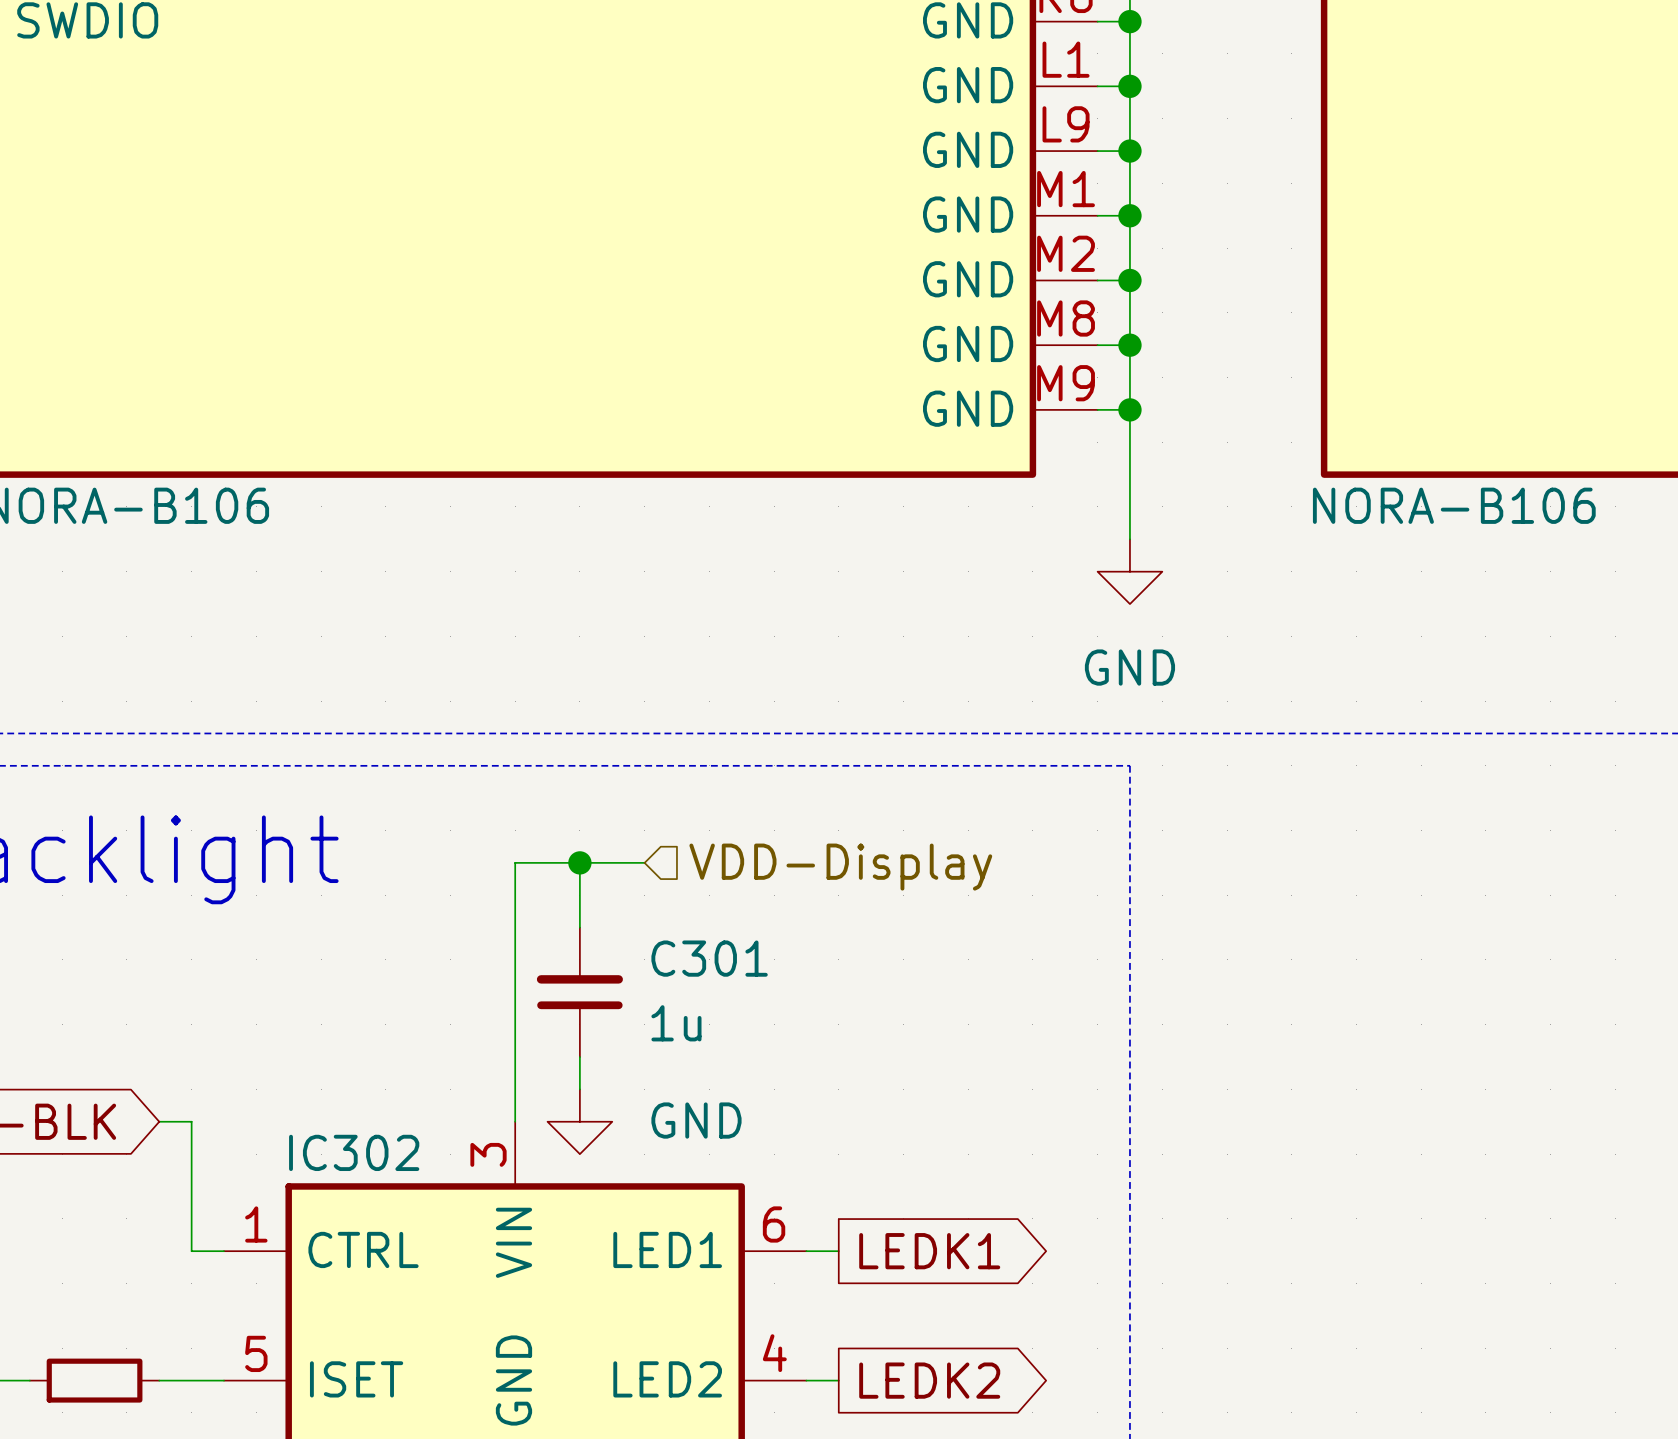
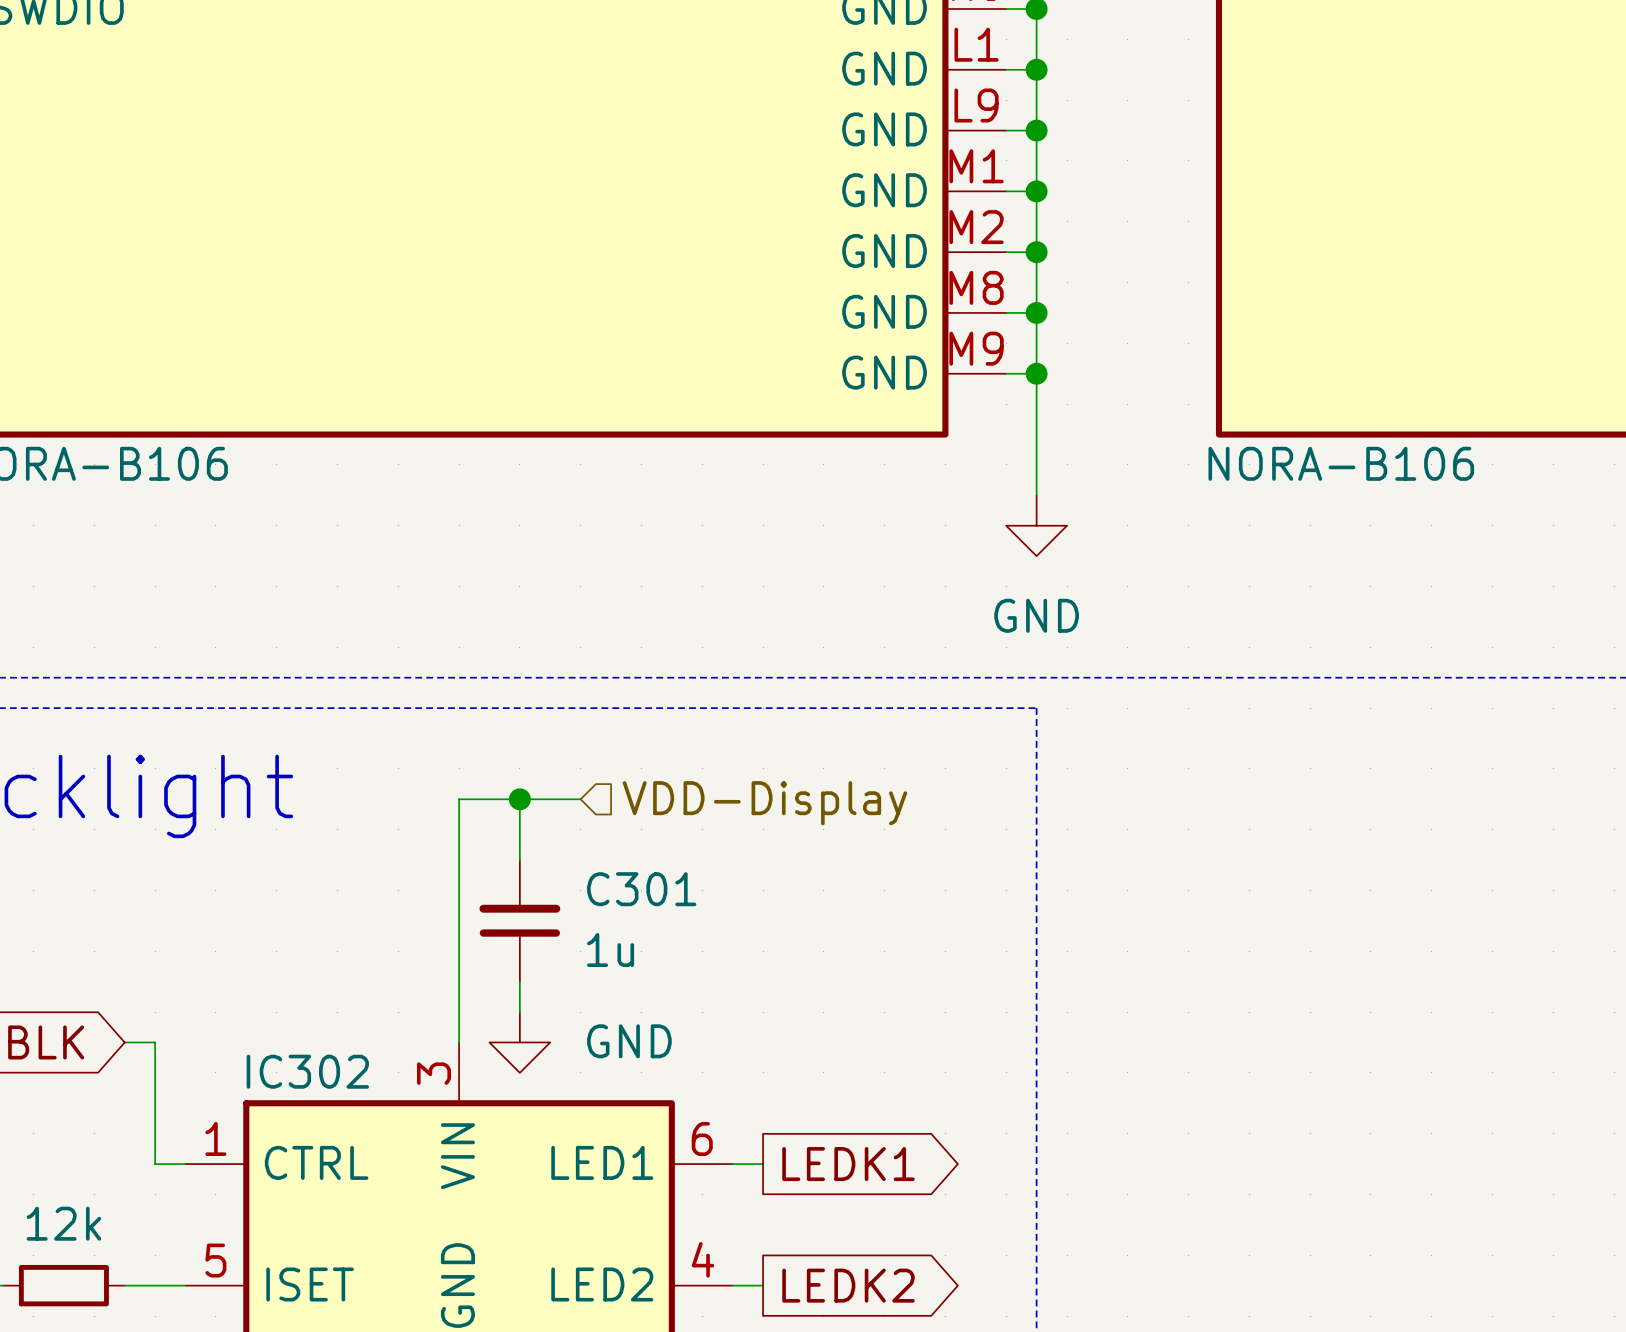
part value: none -> 12k (63, 1223)

